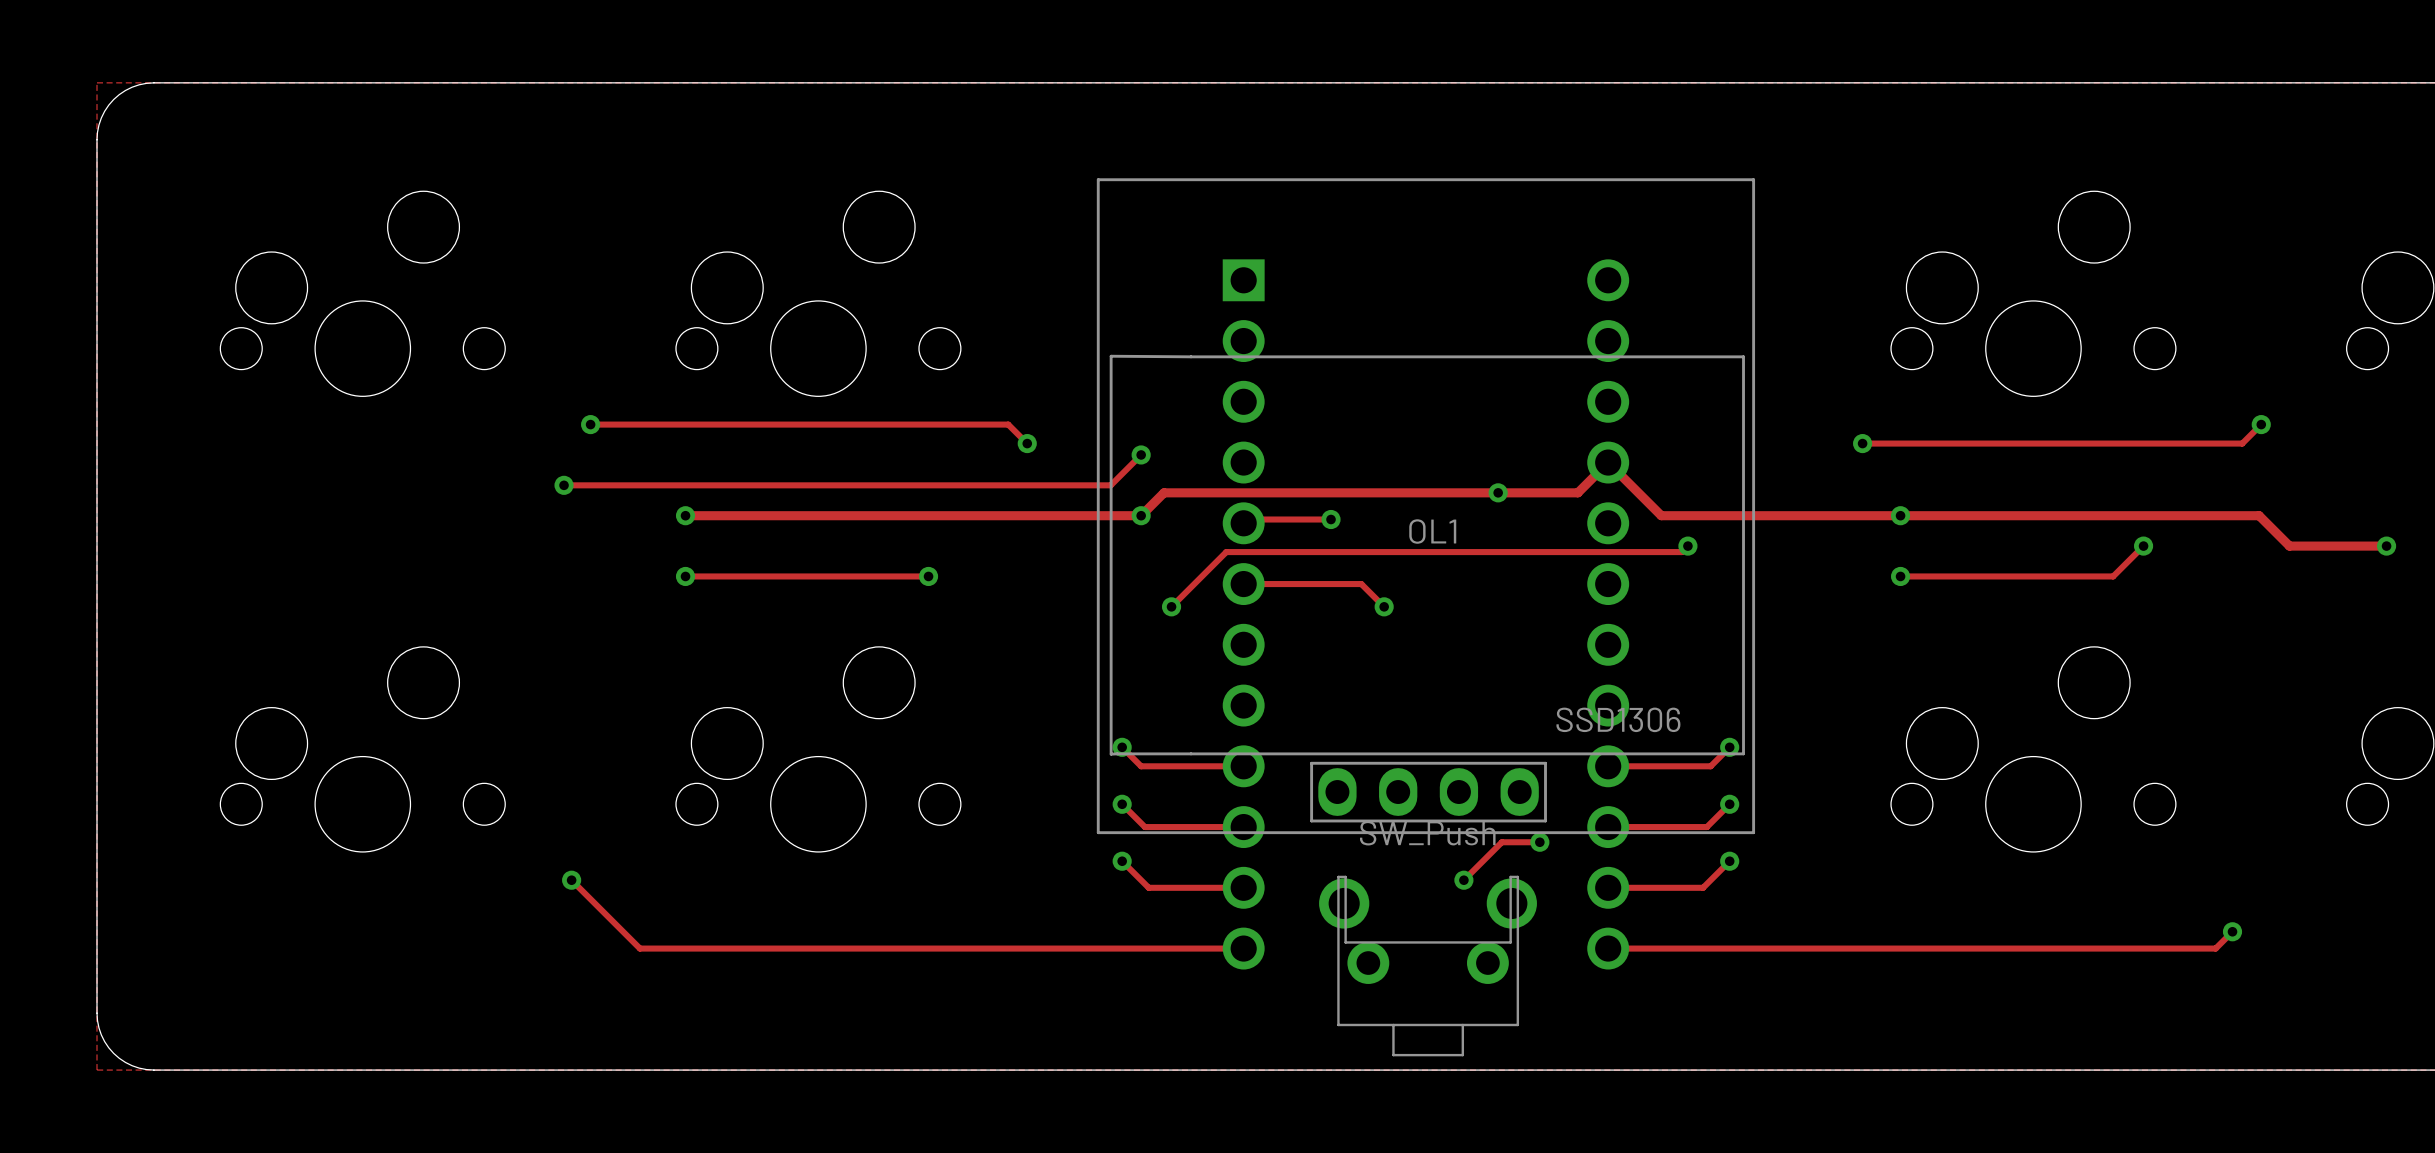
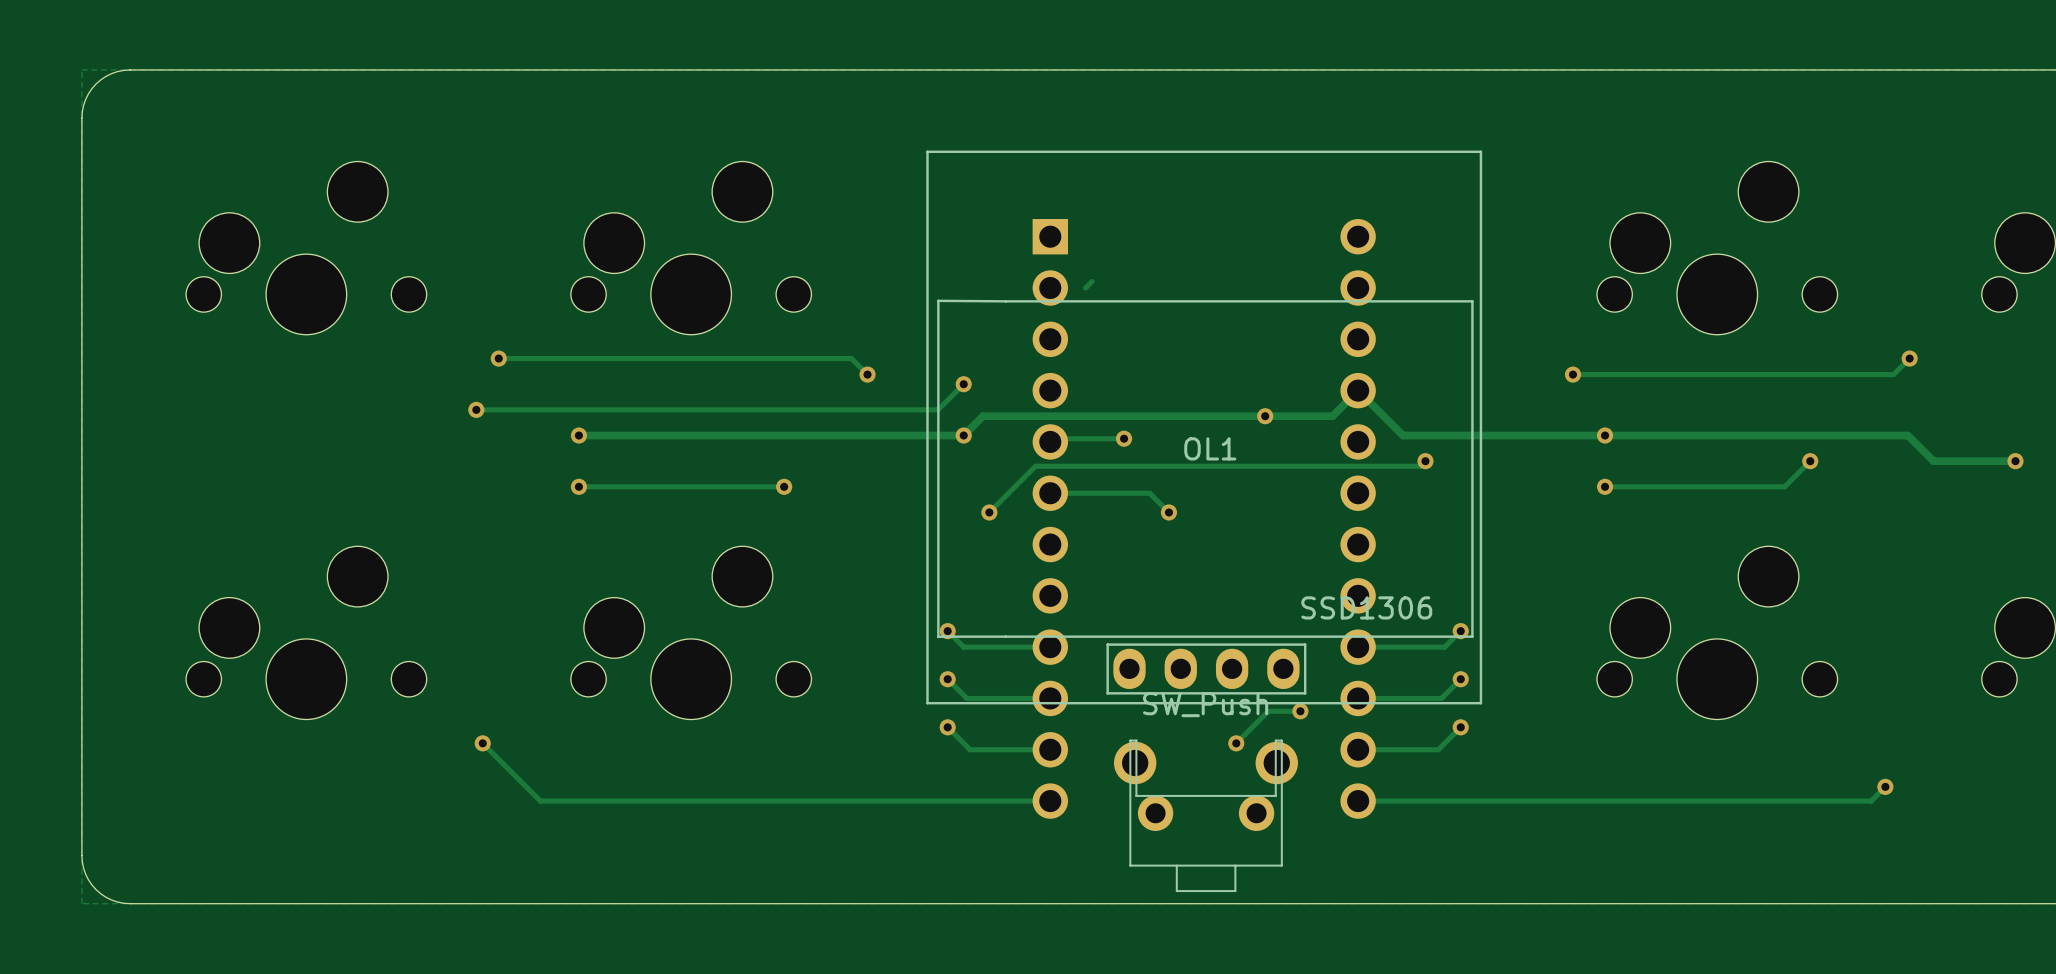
track: none -> (1091, 281) (1085, 288)

